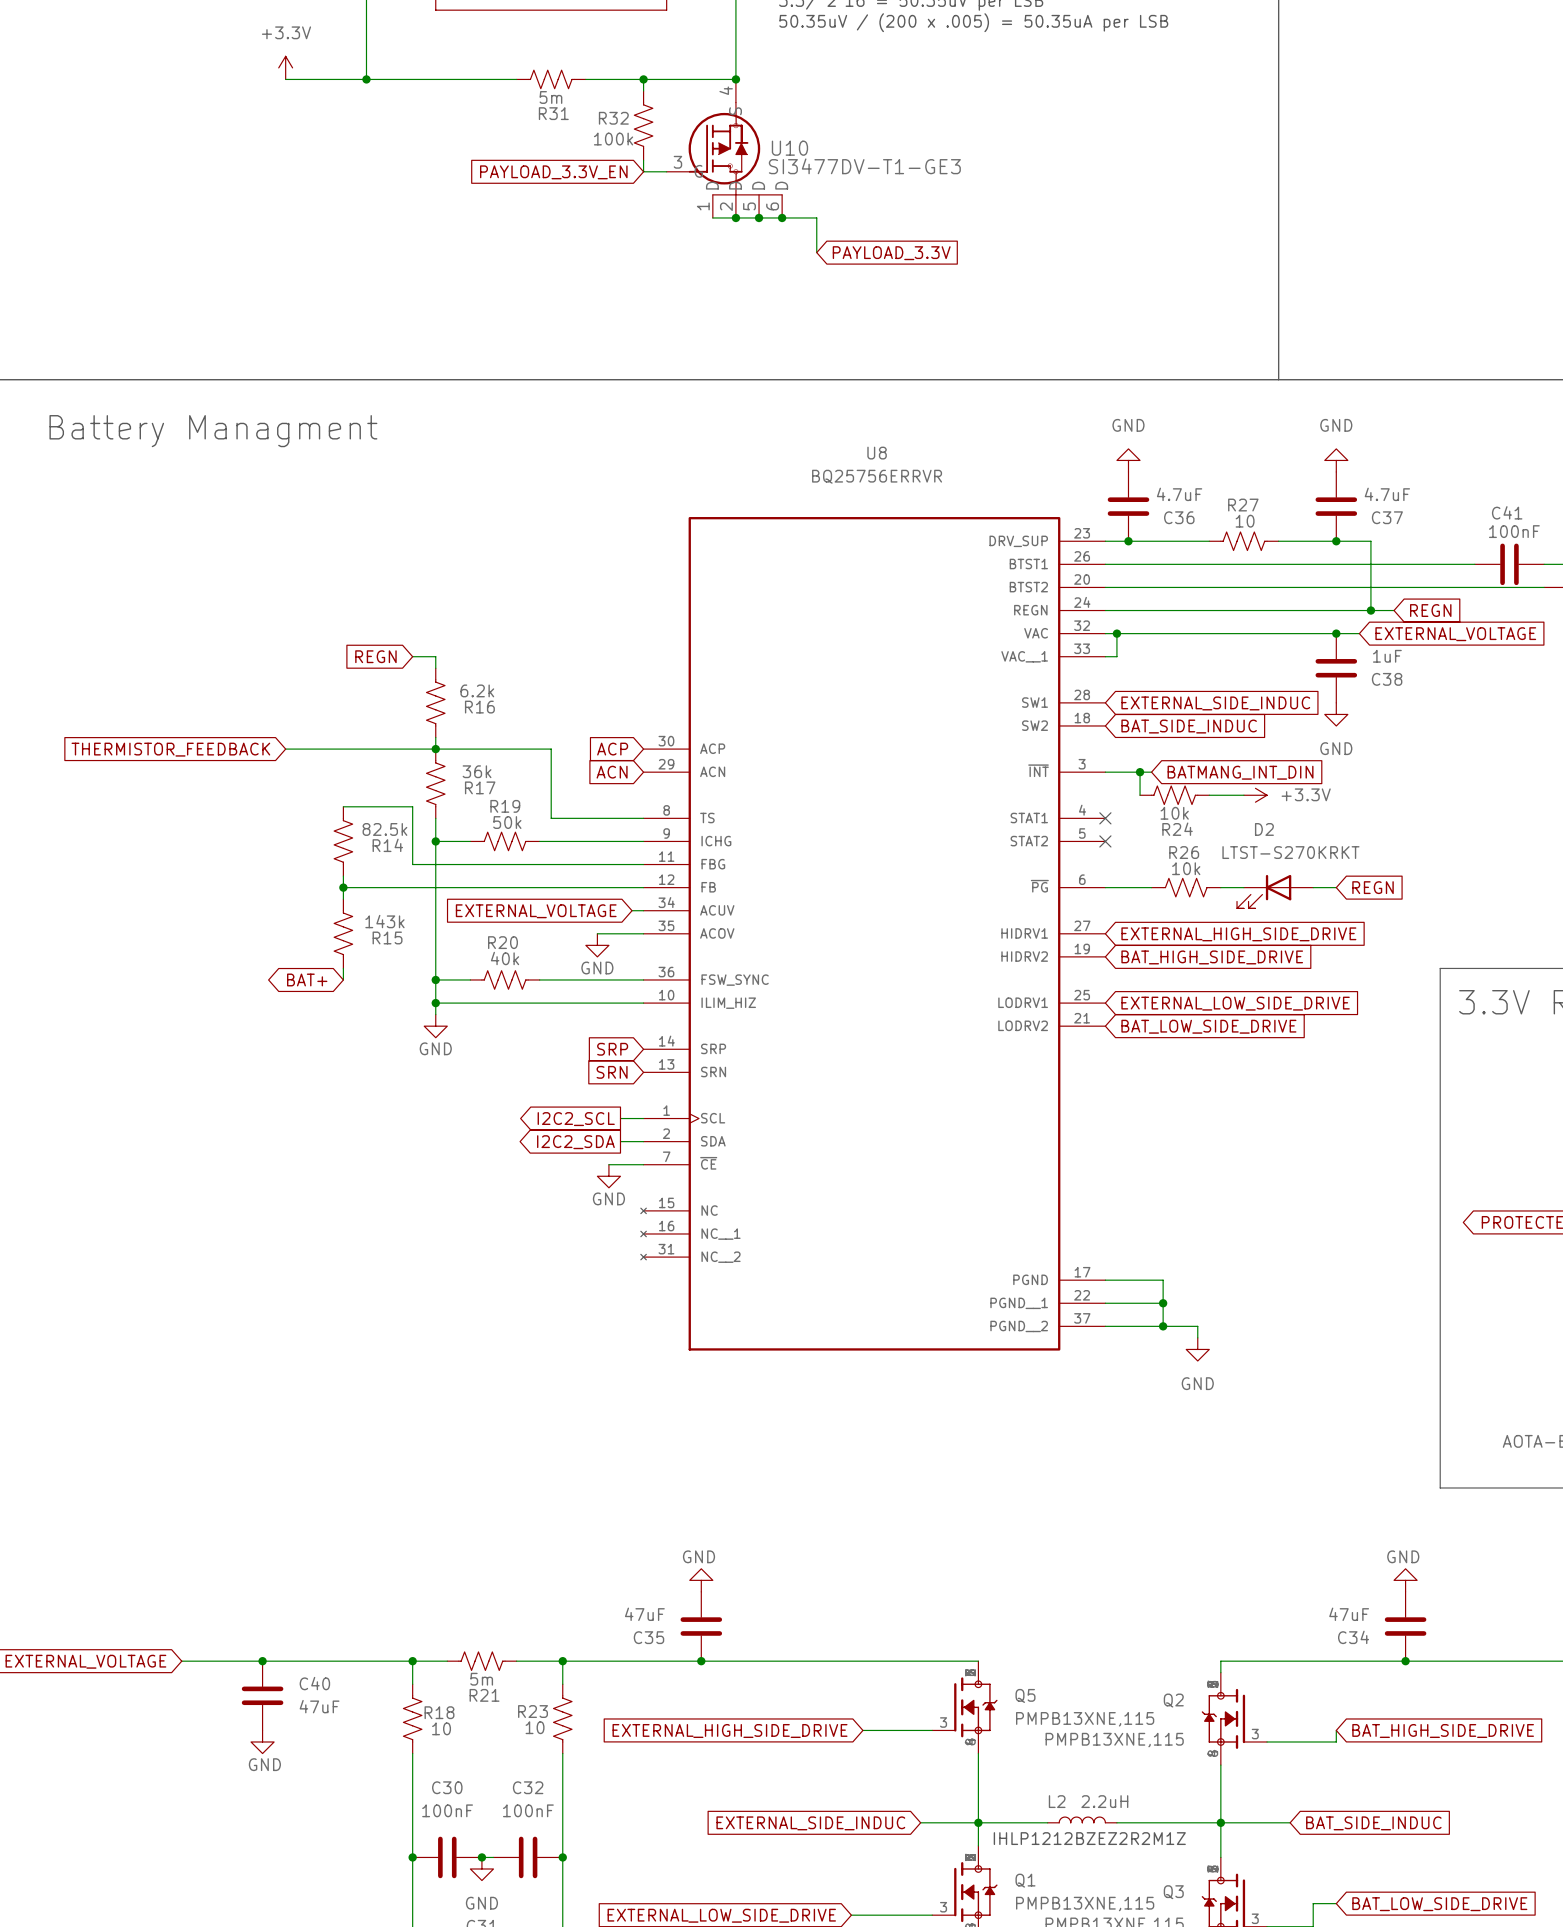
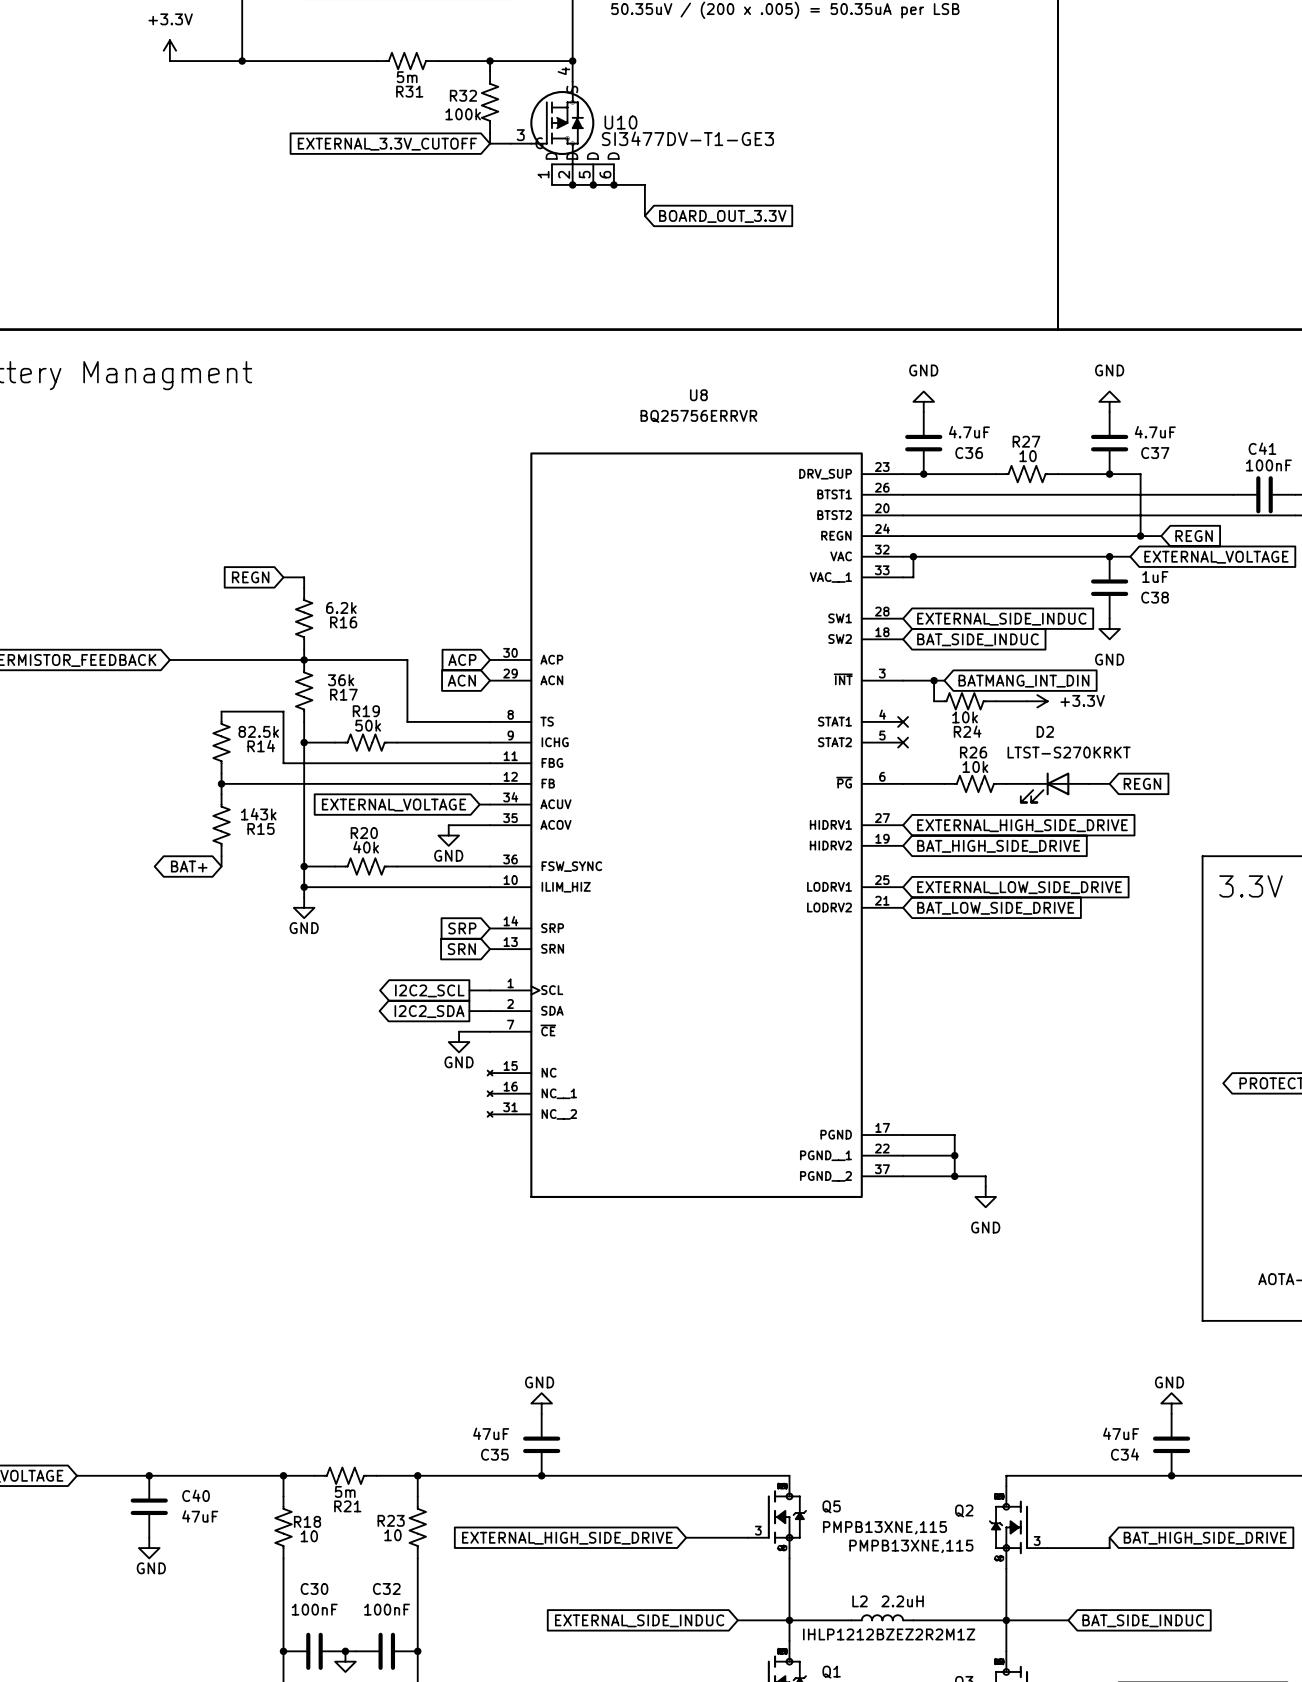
global label: PAYLOAD_3.3V_EN (553, 172) -> EXTERNAL_3.3V_CUTOFF (387, 144)
global label: PAYLOAD_3.3V (891, 253) -> BOARD_OUT_3.3V (722, 216)

